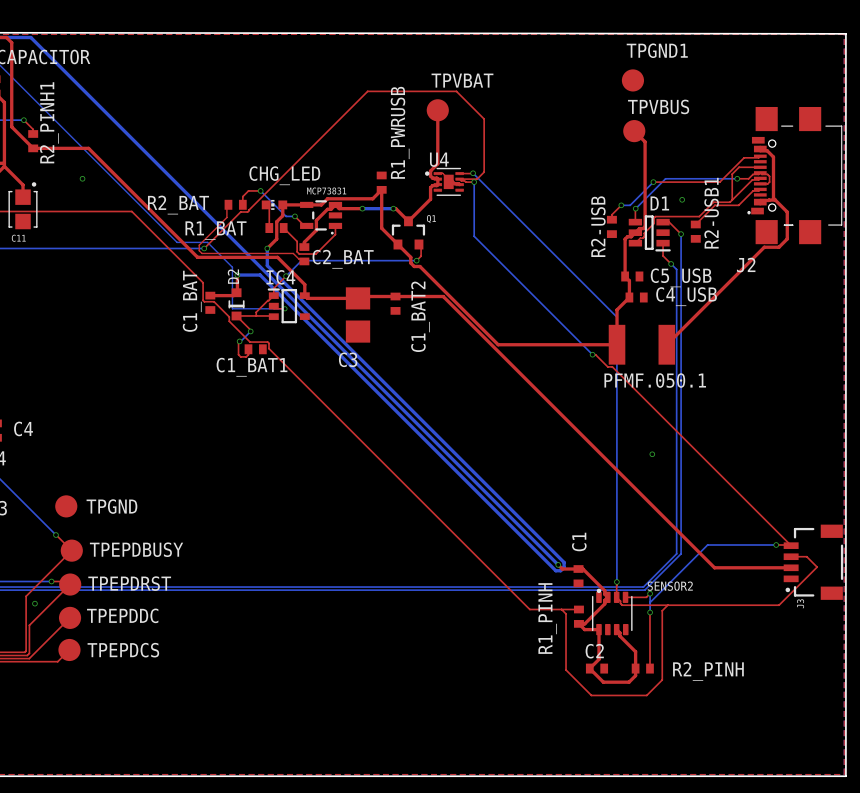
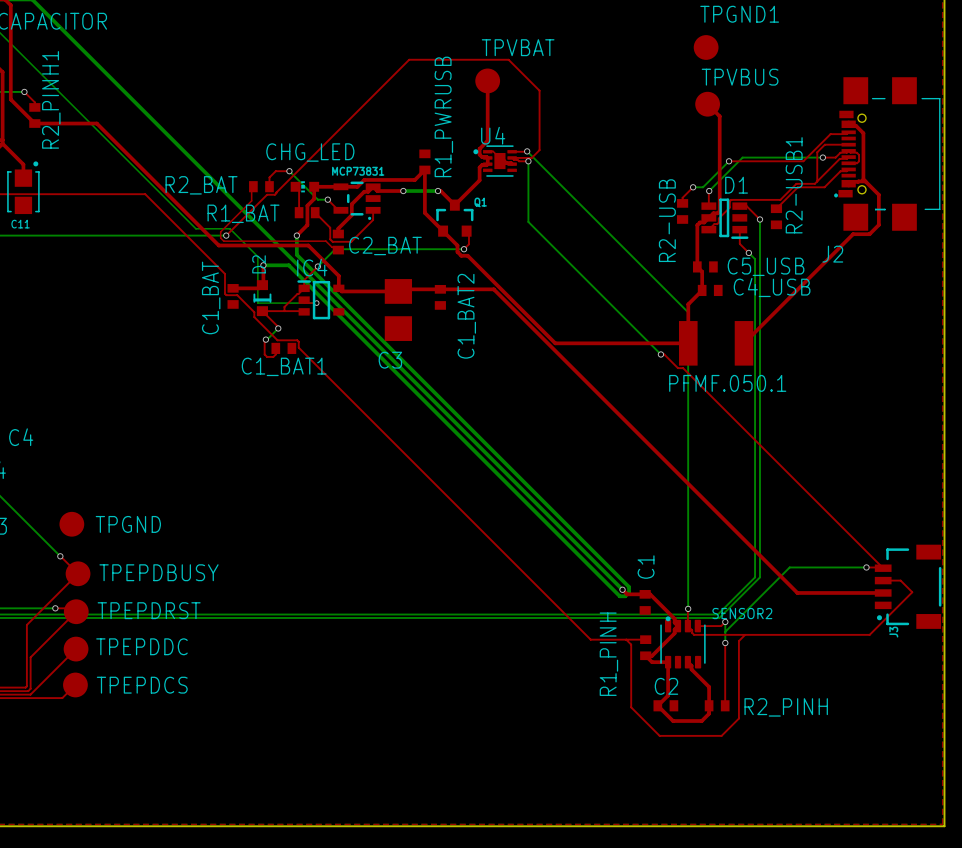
via: (82, 178) -> none
via: (682, 199) -> none
via: (652, 454) -> none
via: (34, 603) -> none

